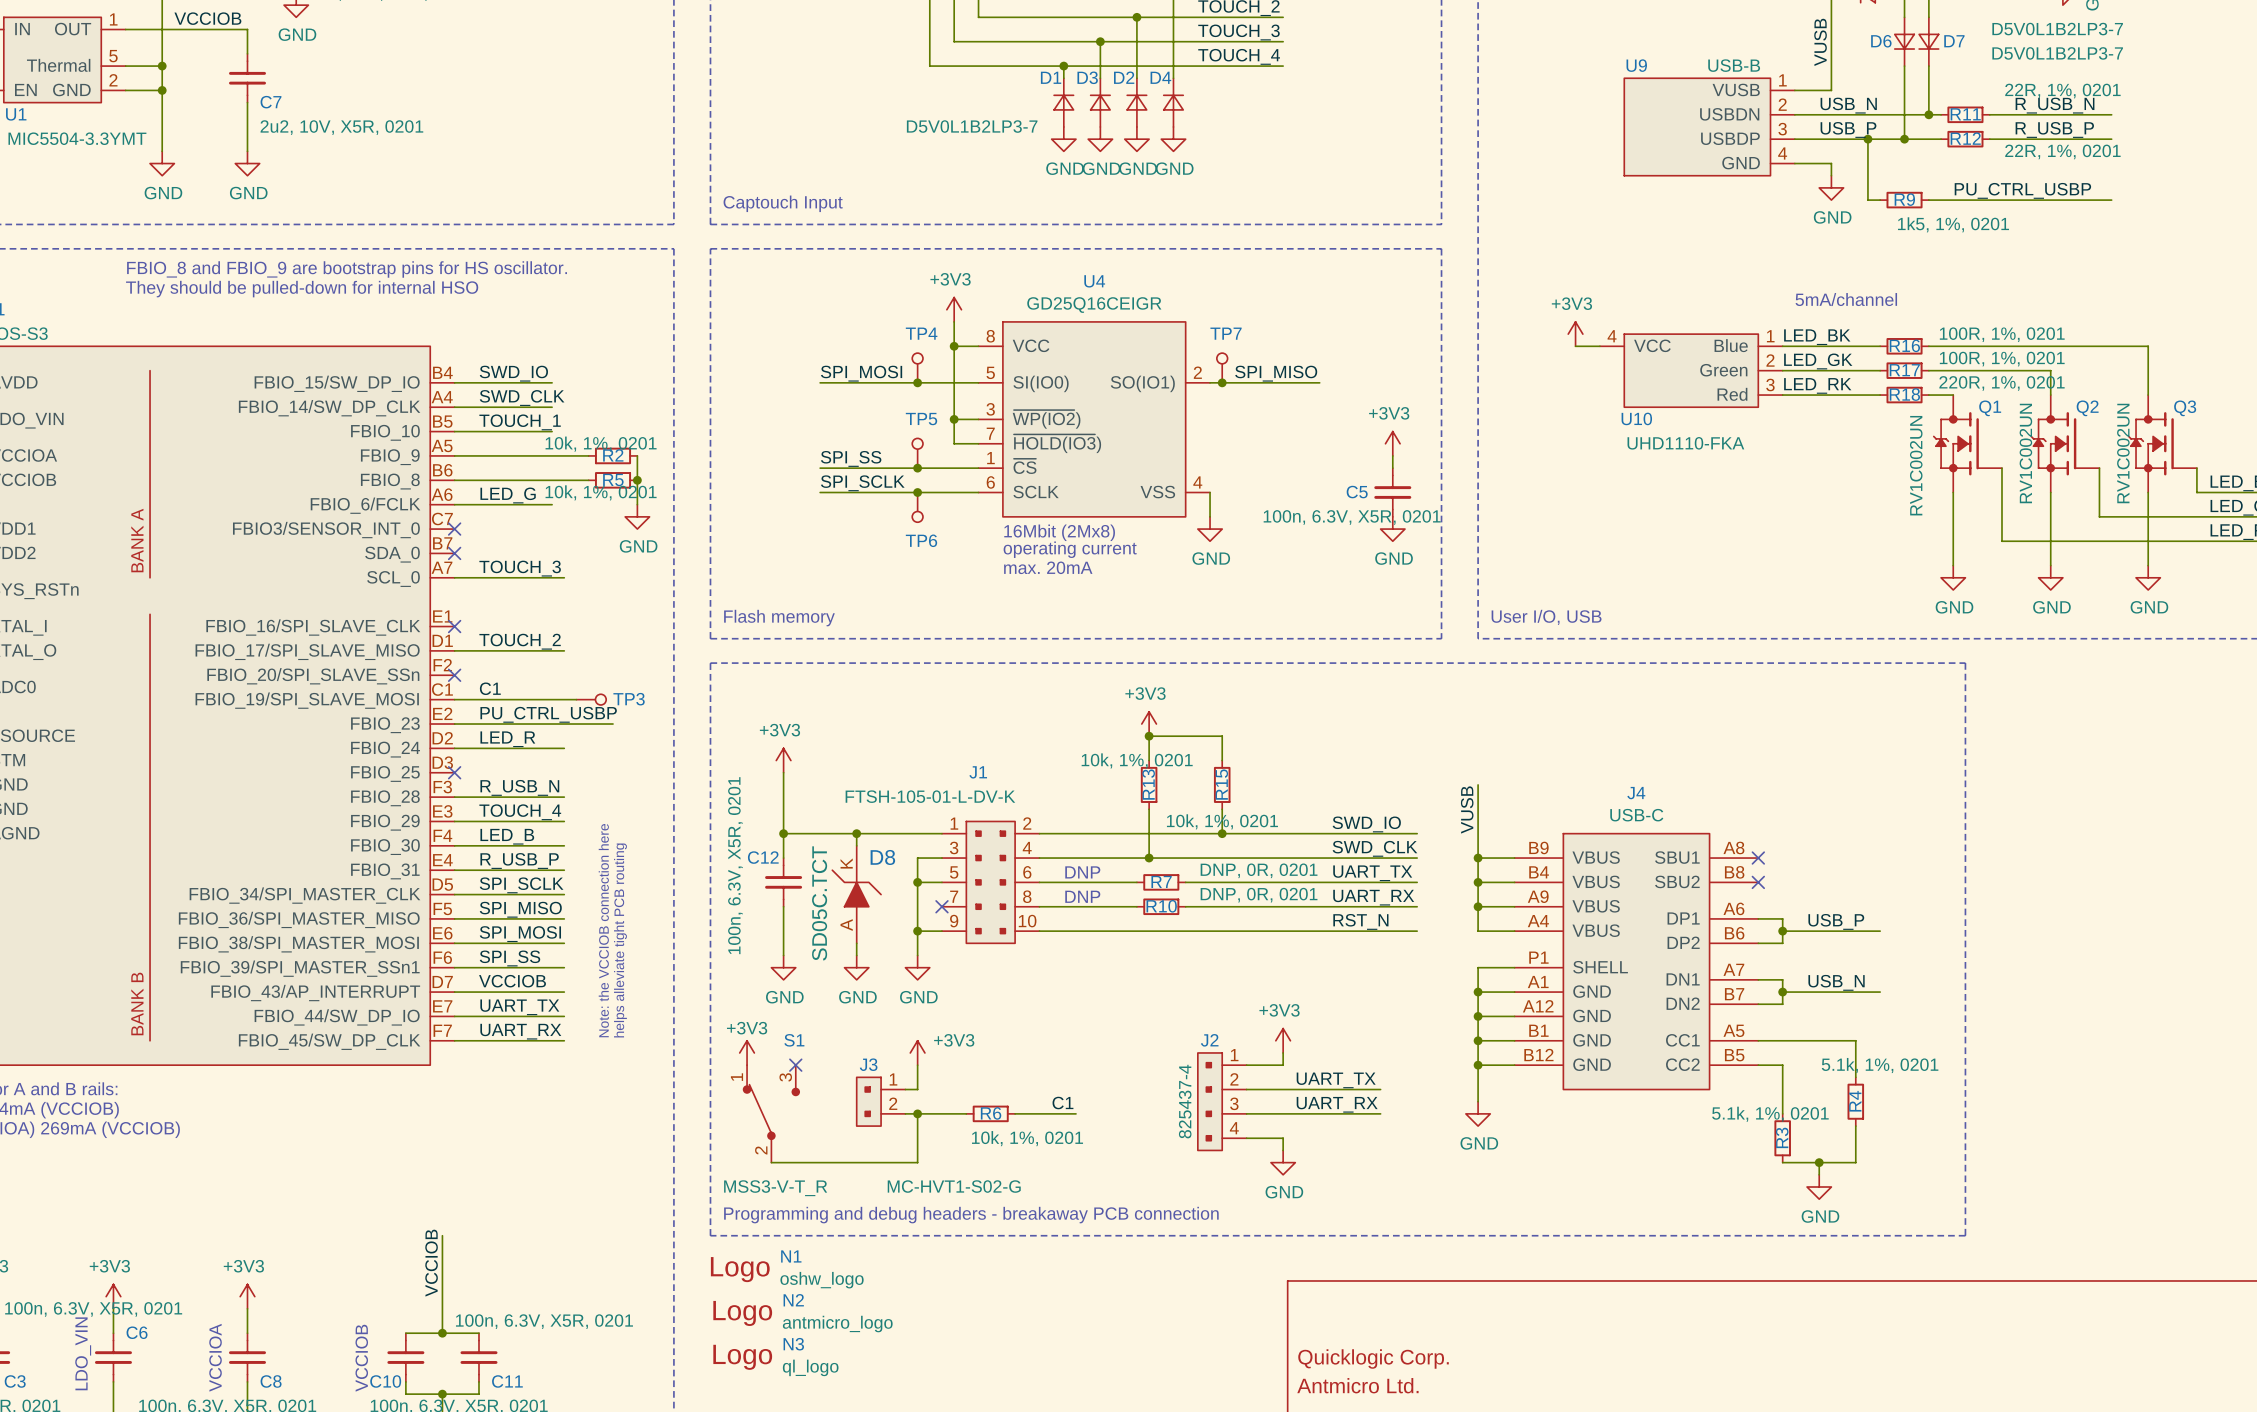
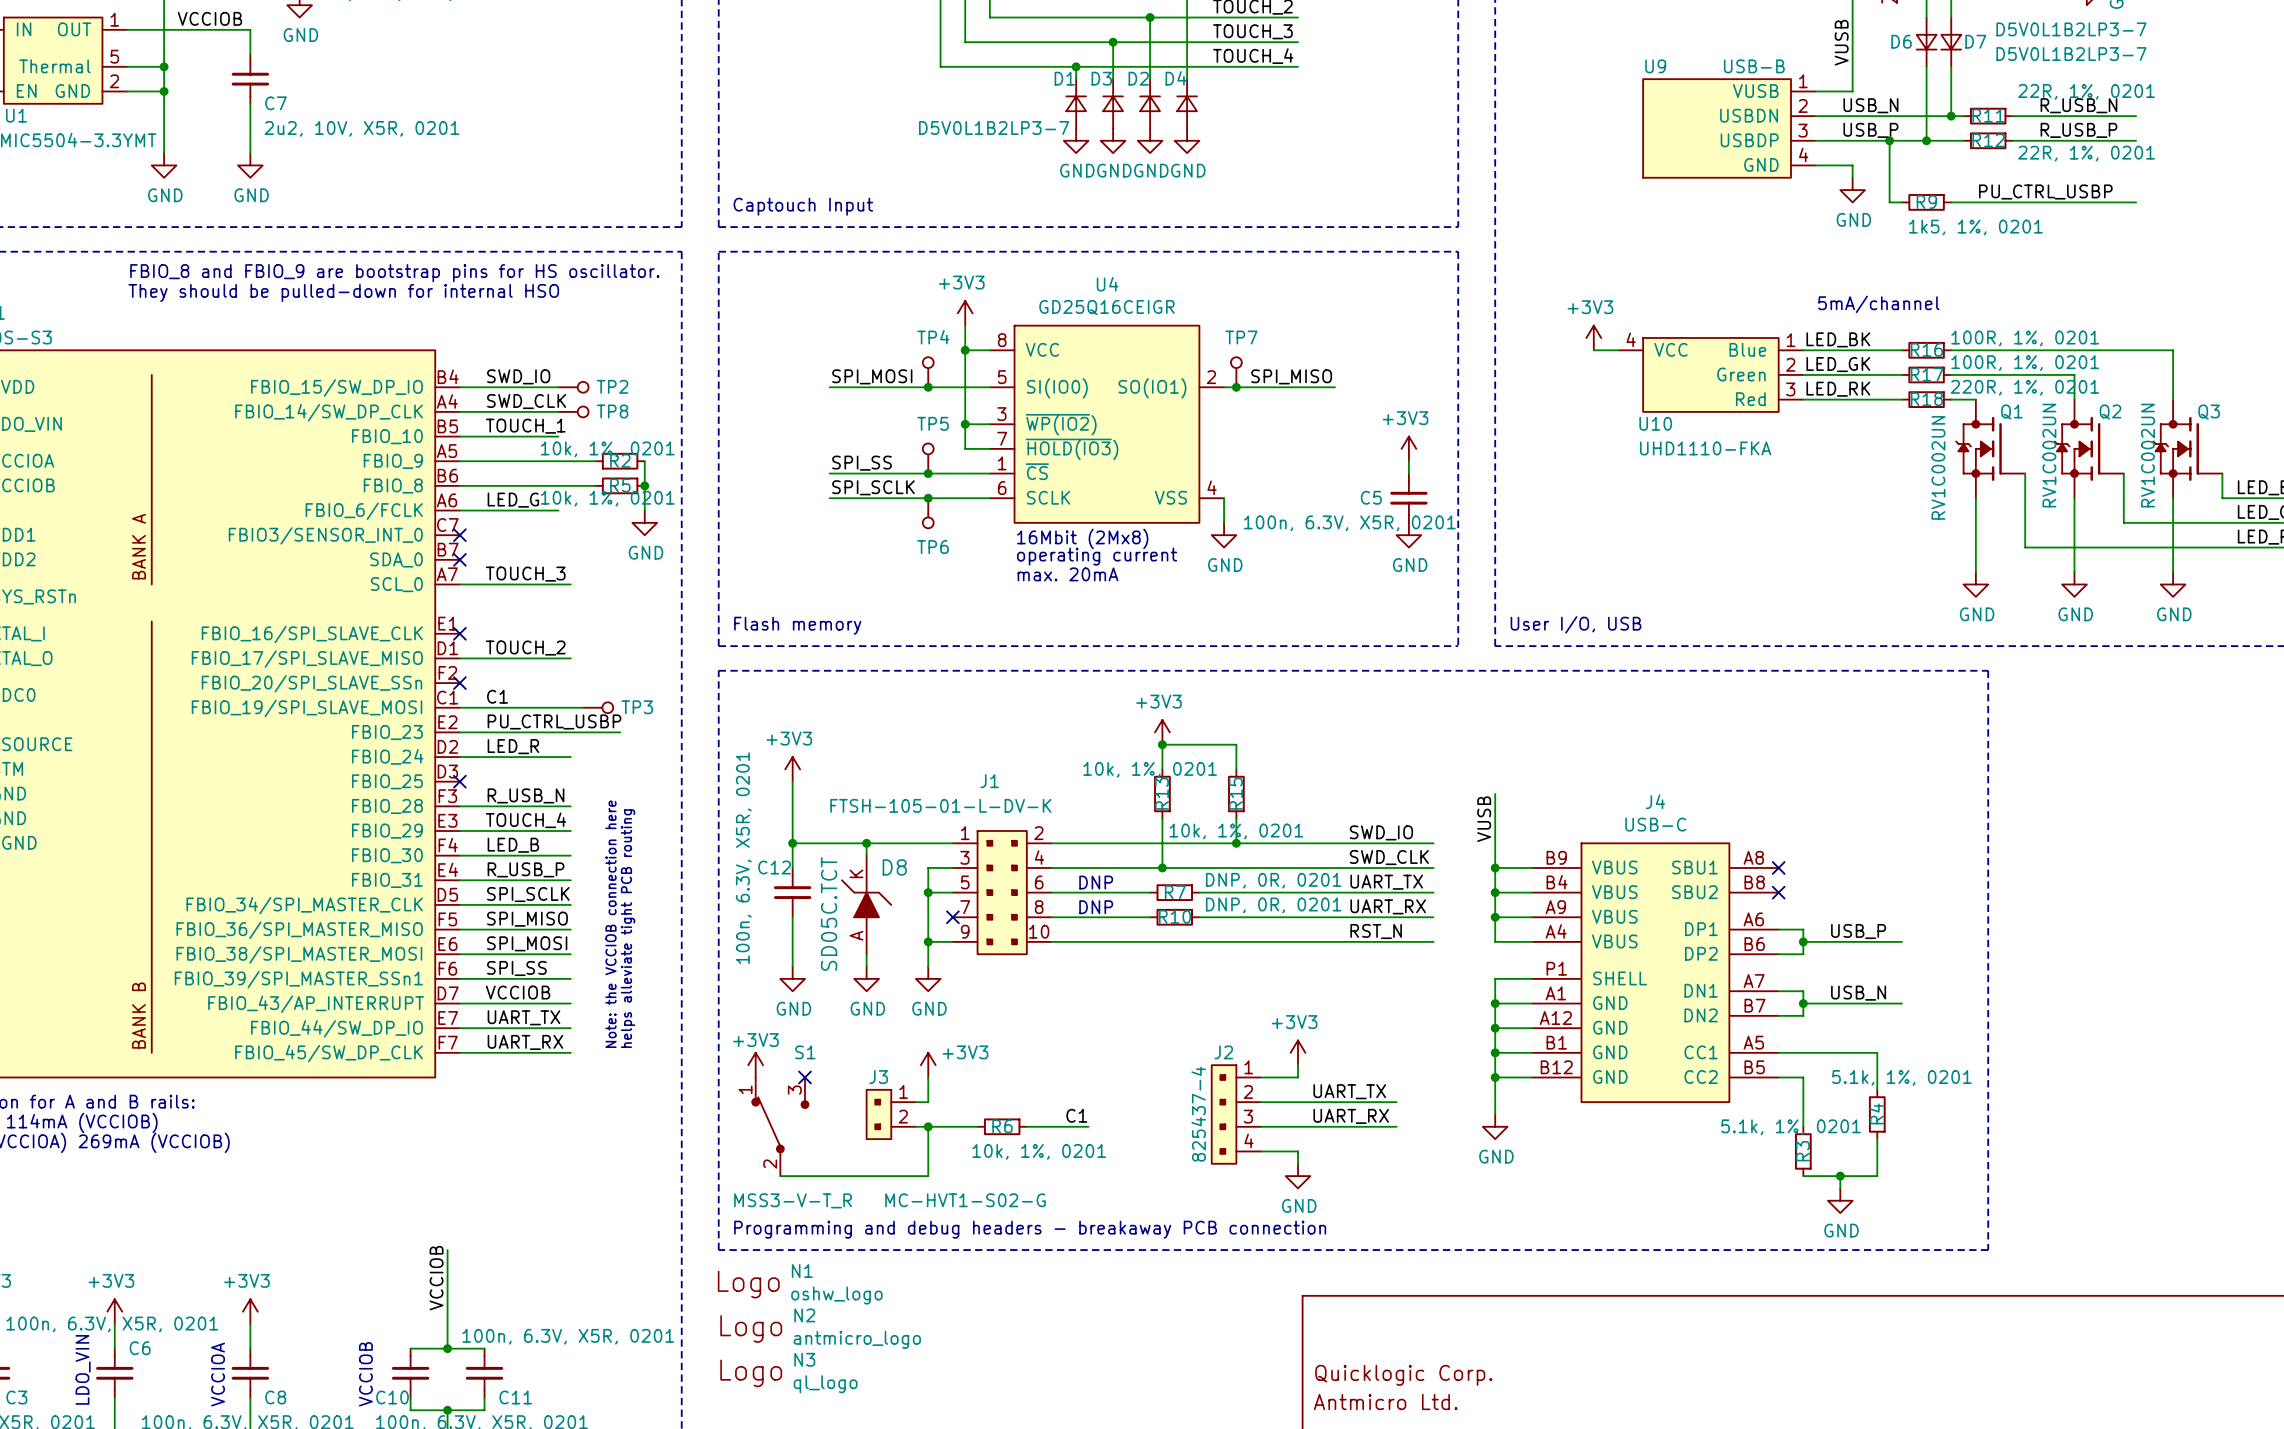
TP2: none -> (573, 387)
TP8: none -> (573, 411)

